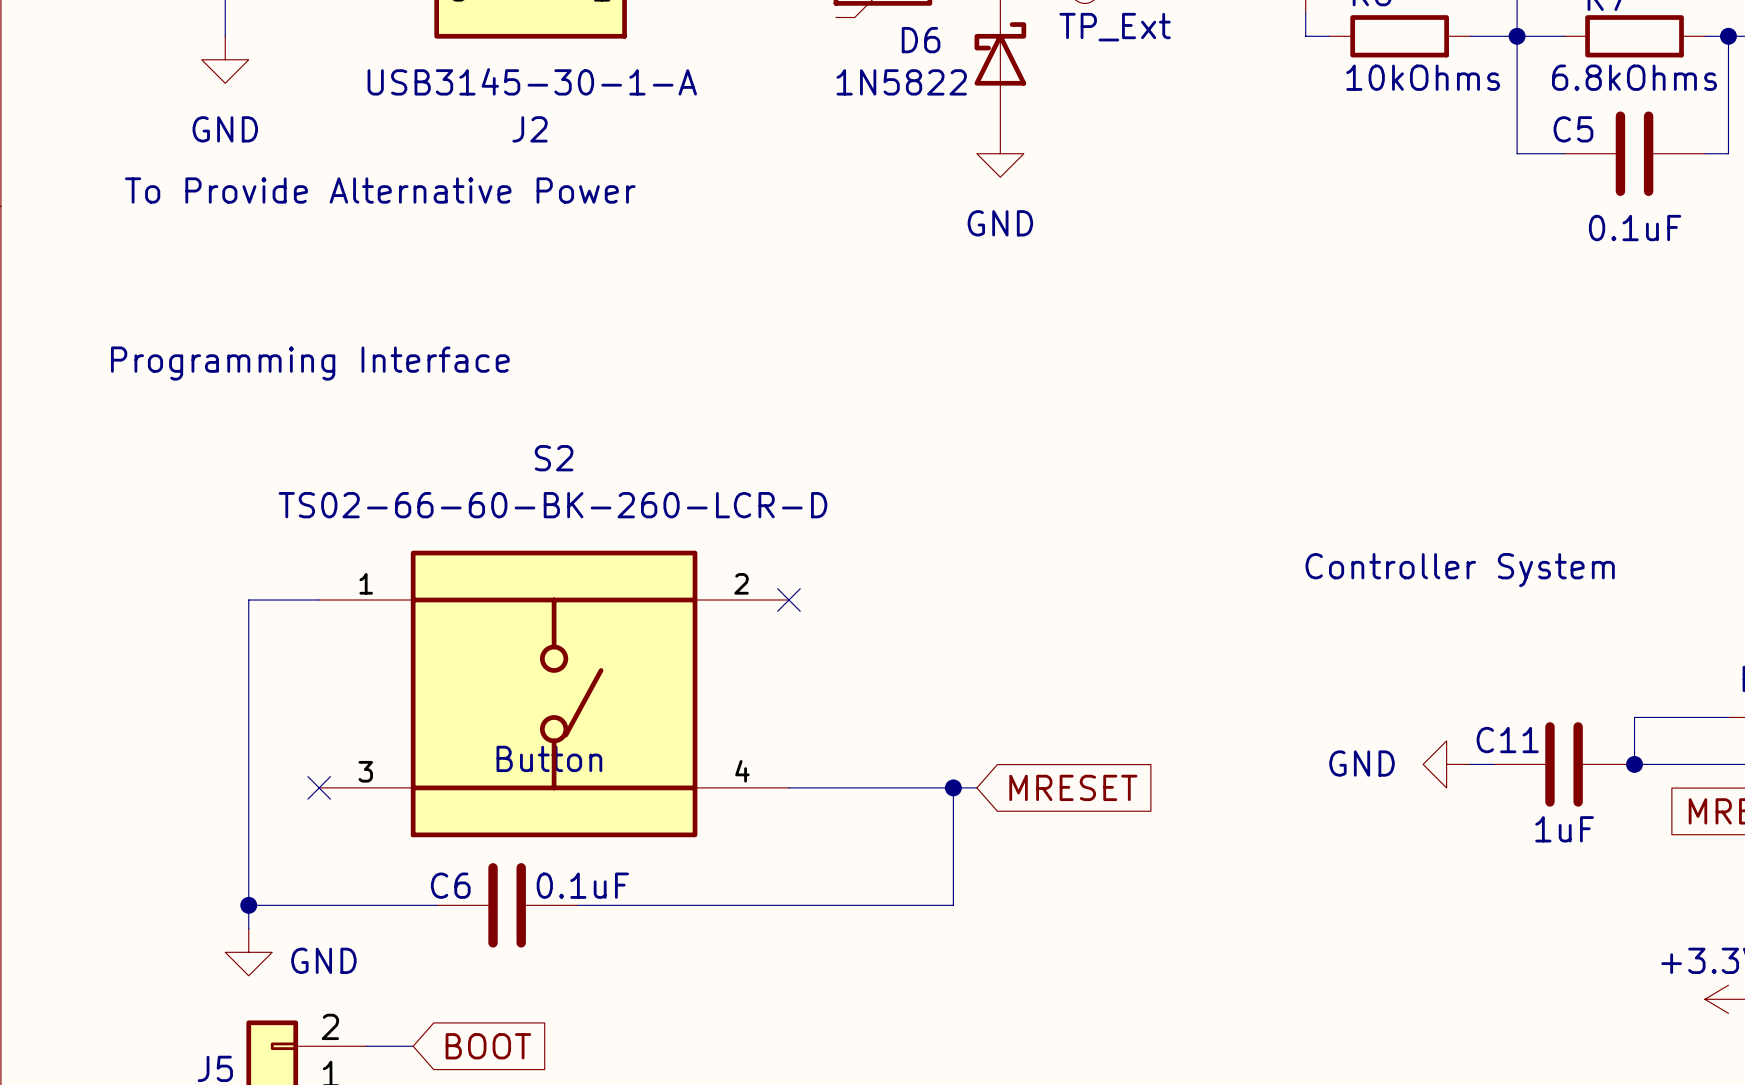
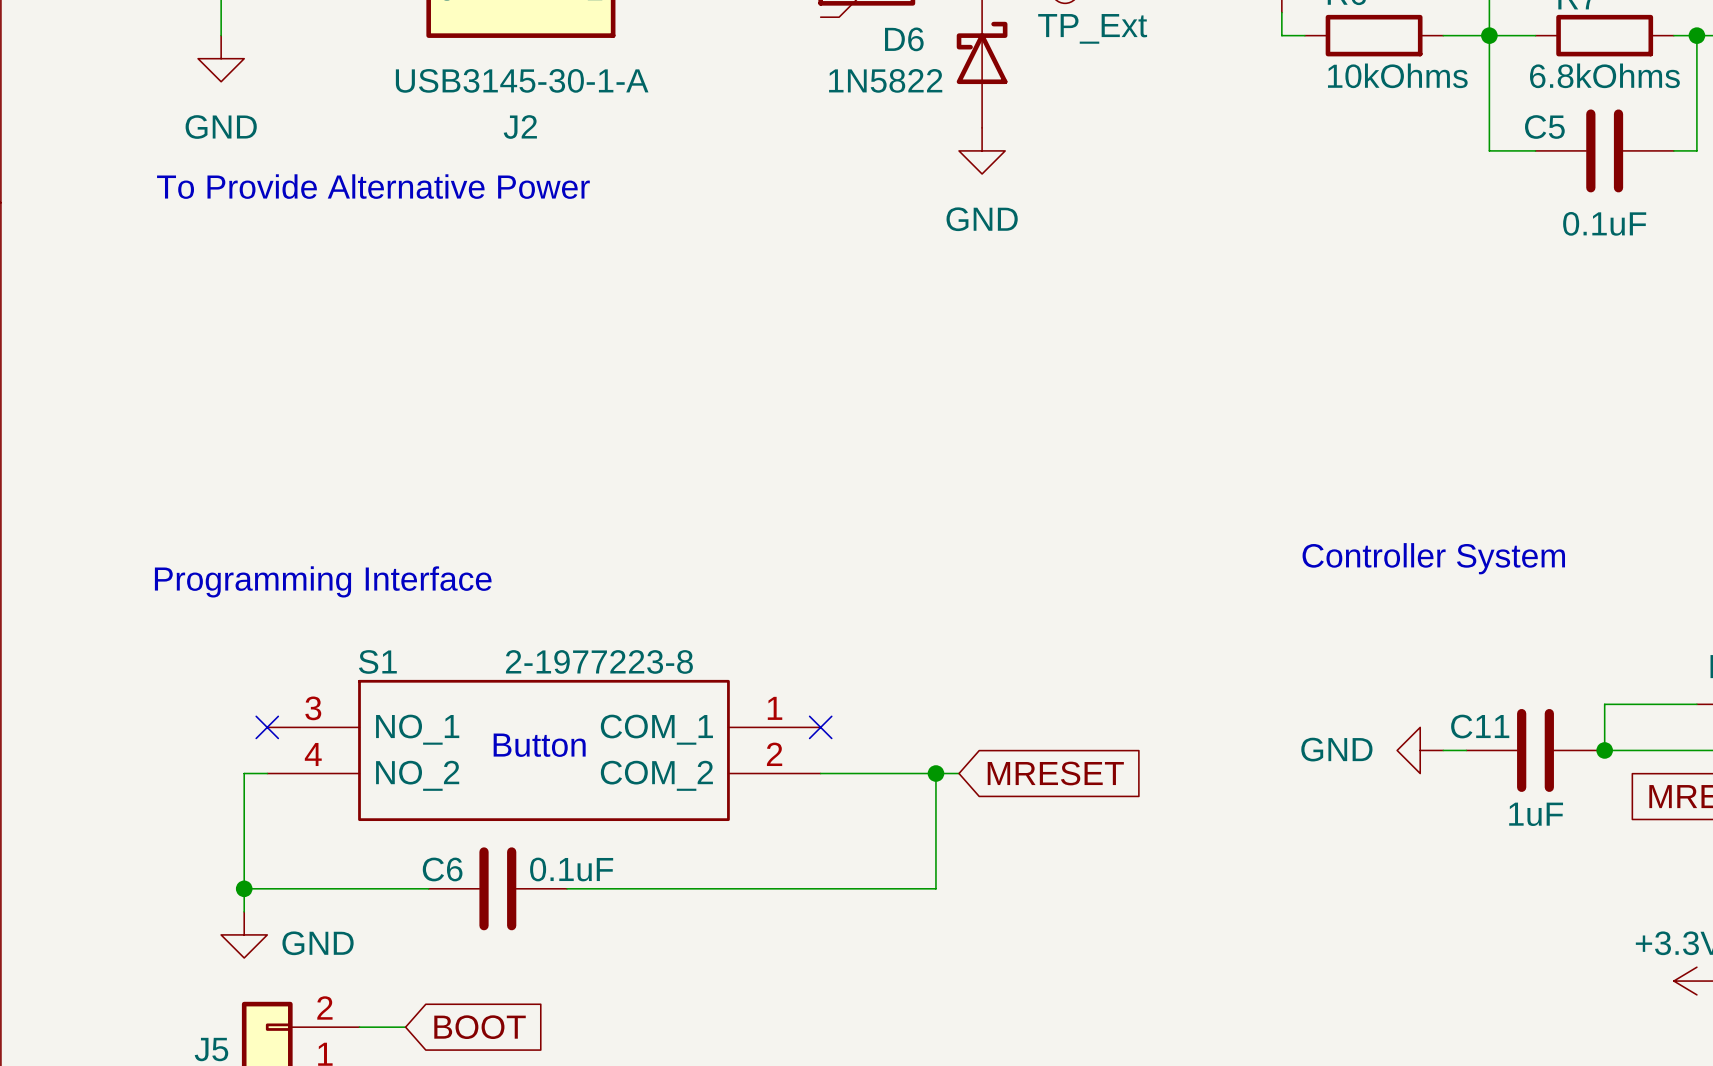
text position: Programming Interface (310, 363) -> Programming Interface (323, 581)
wire: (319, 600) (248, 600) (248, 787) -> (267, 773) (244, 773)
no-connect mark: (788, 600) -> none
S2: TS02-66-60-BK-260-LCR-D (554, 693) -> none
no-connect mark: none -> (820, 727)
S1: none -> 2-1977223-8 (543, 750)
no-connect mark position: (319, 787) -> (267, 727)

